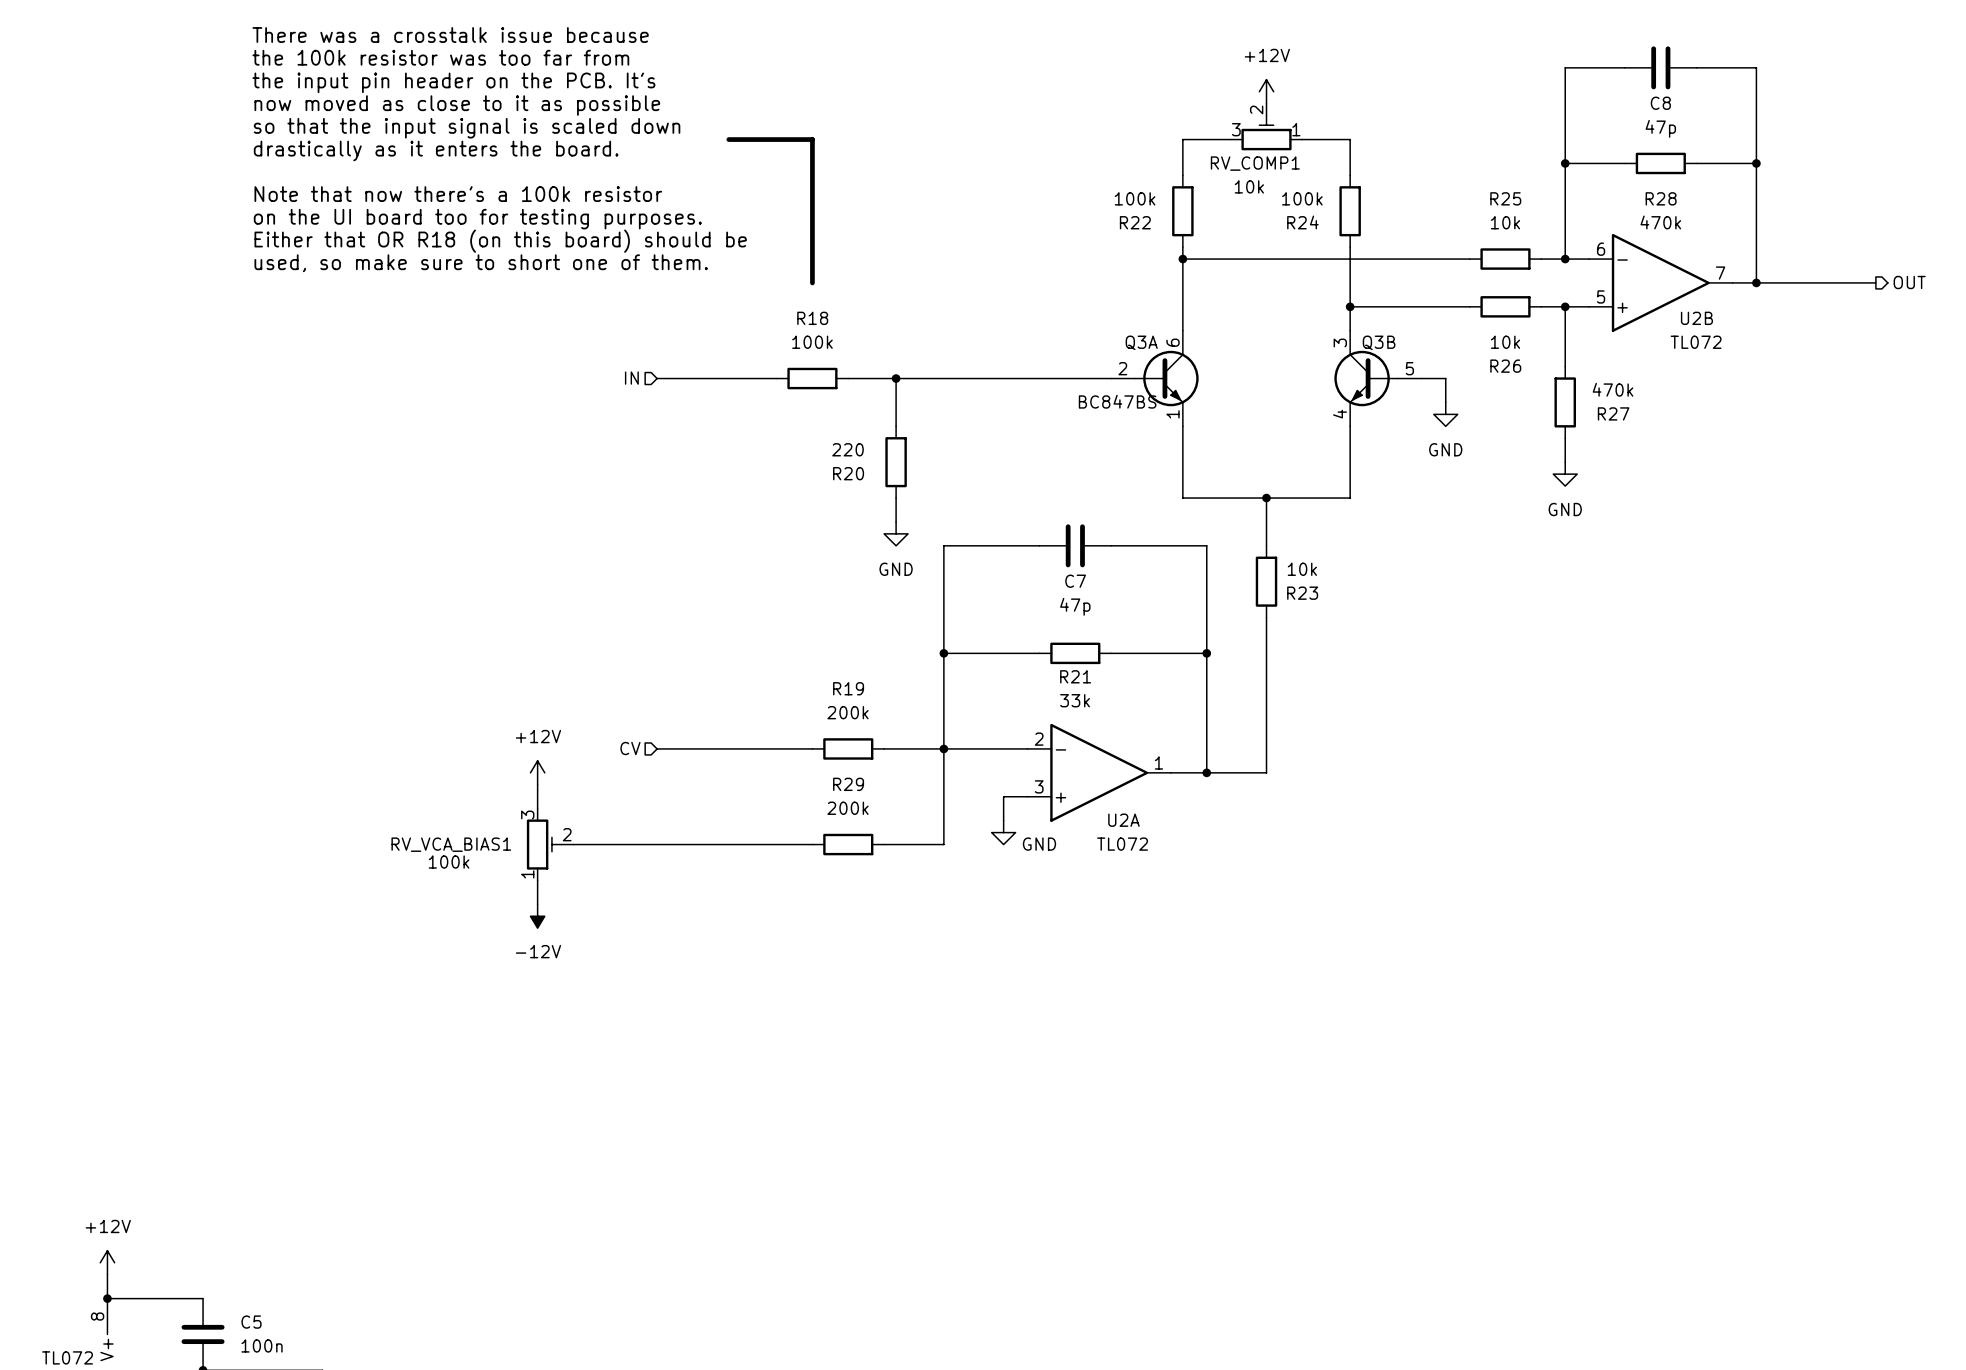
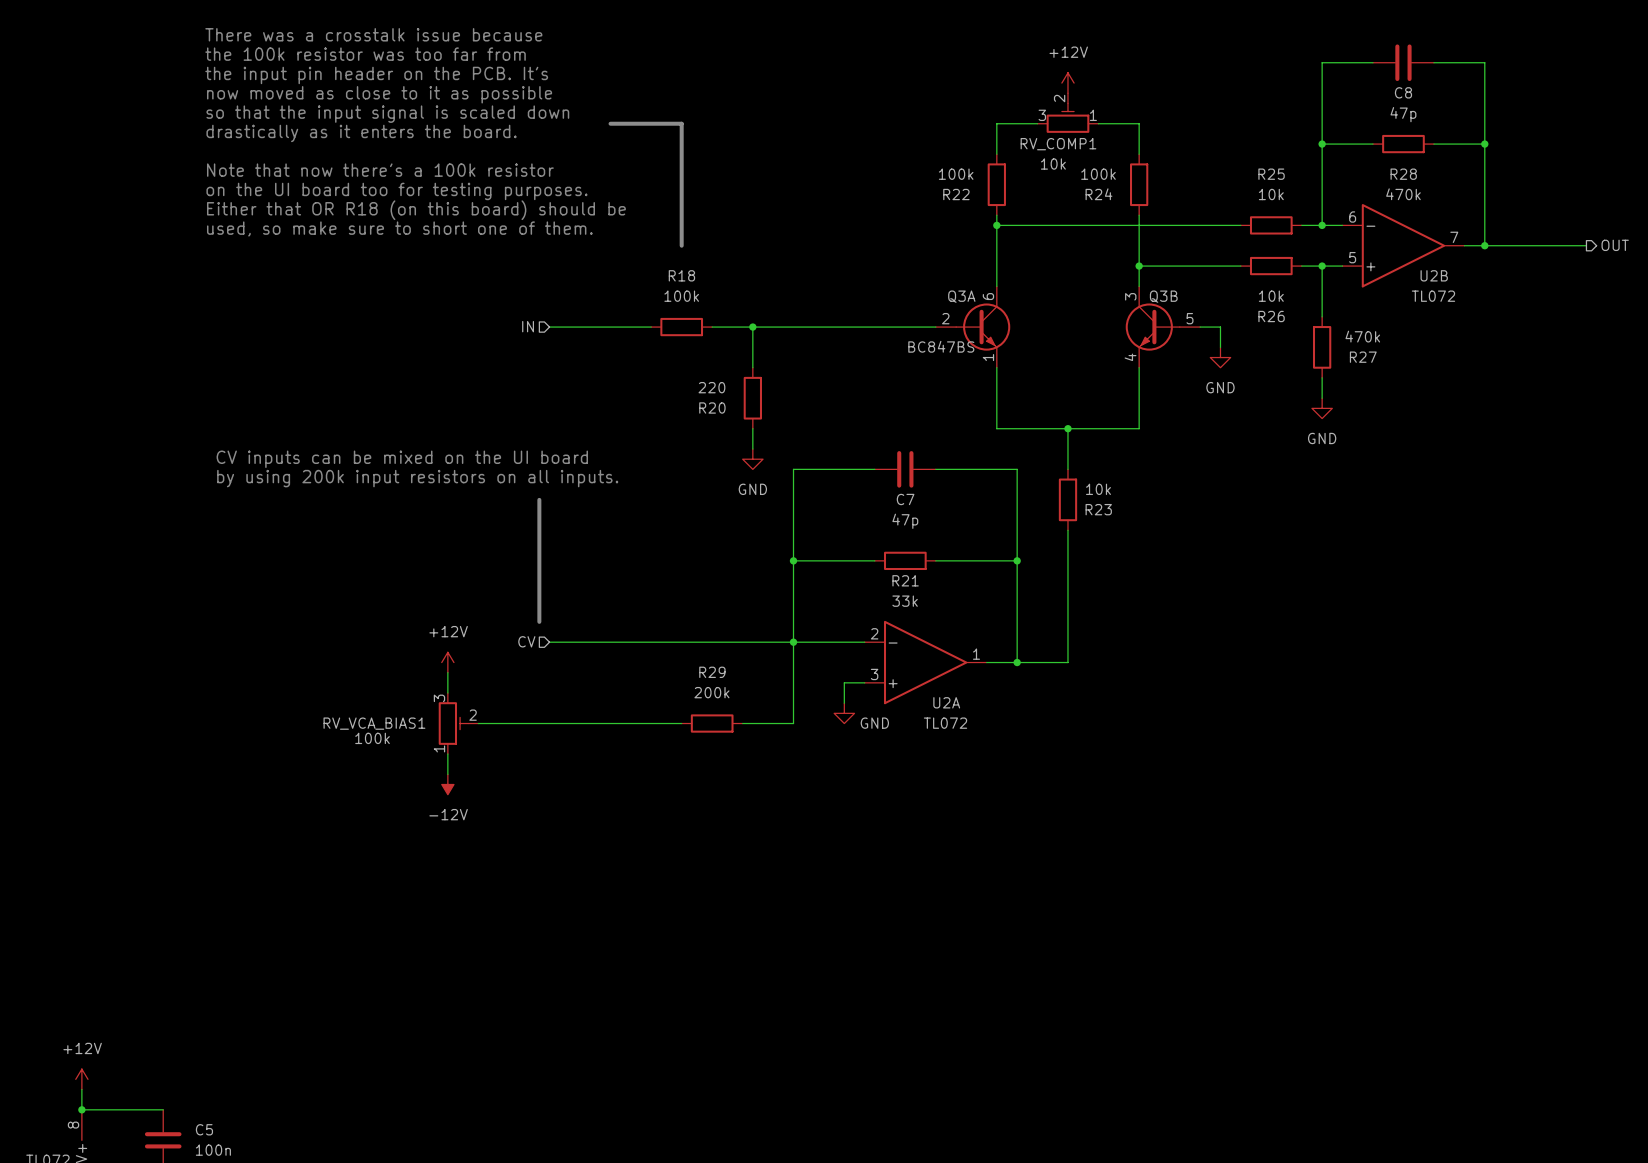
text: none -> CV inputs can be mixed on the UI board (402, 459)
text: none -> by using 200k input resistors on all inputs. (417, 478)
line: none -> (539, 499) (539, 621)
wire: none -> (681, 642) (742, 642)
R19: 200k (848, 748) -> none

